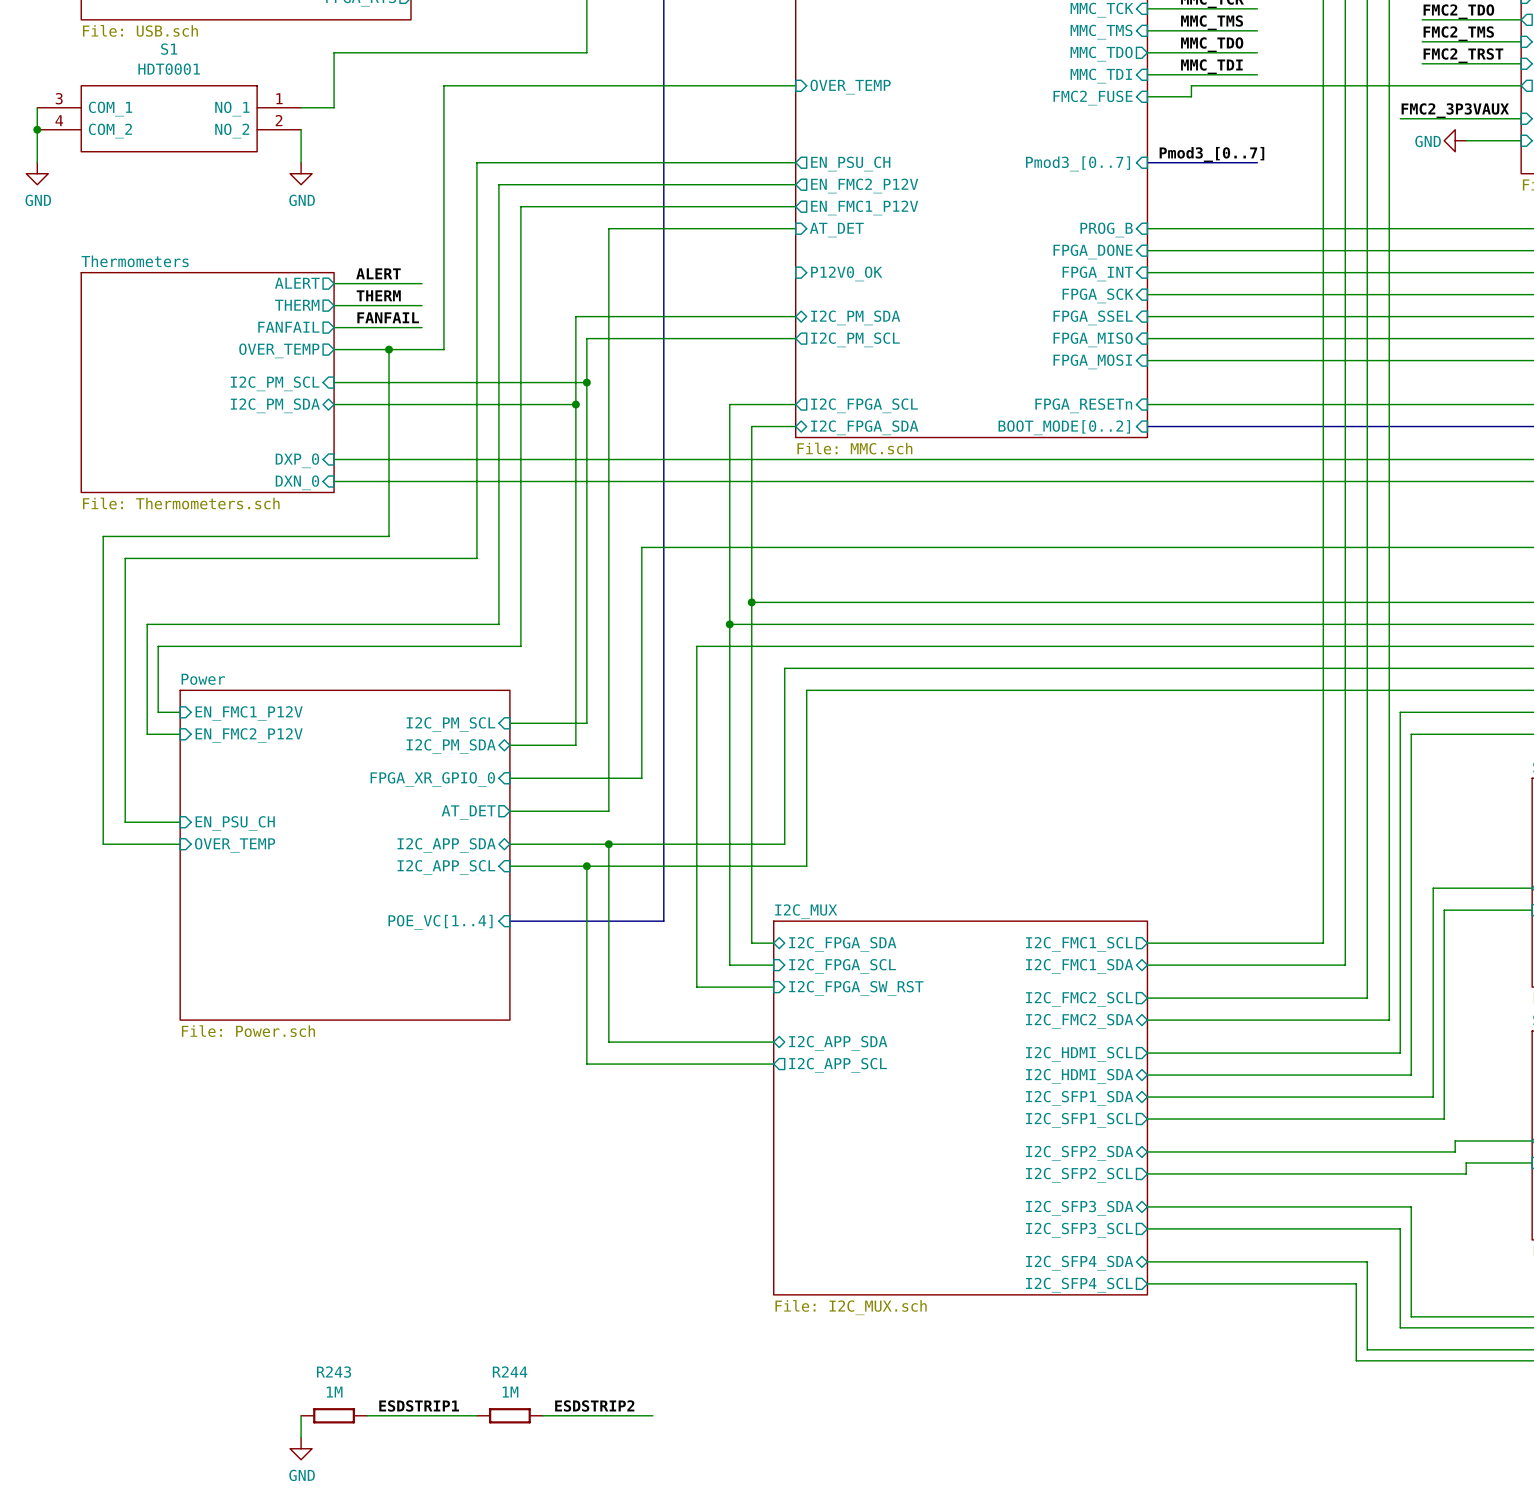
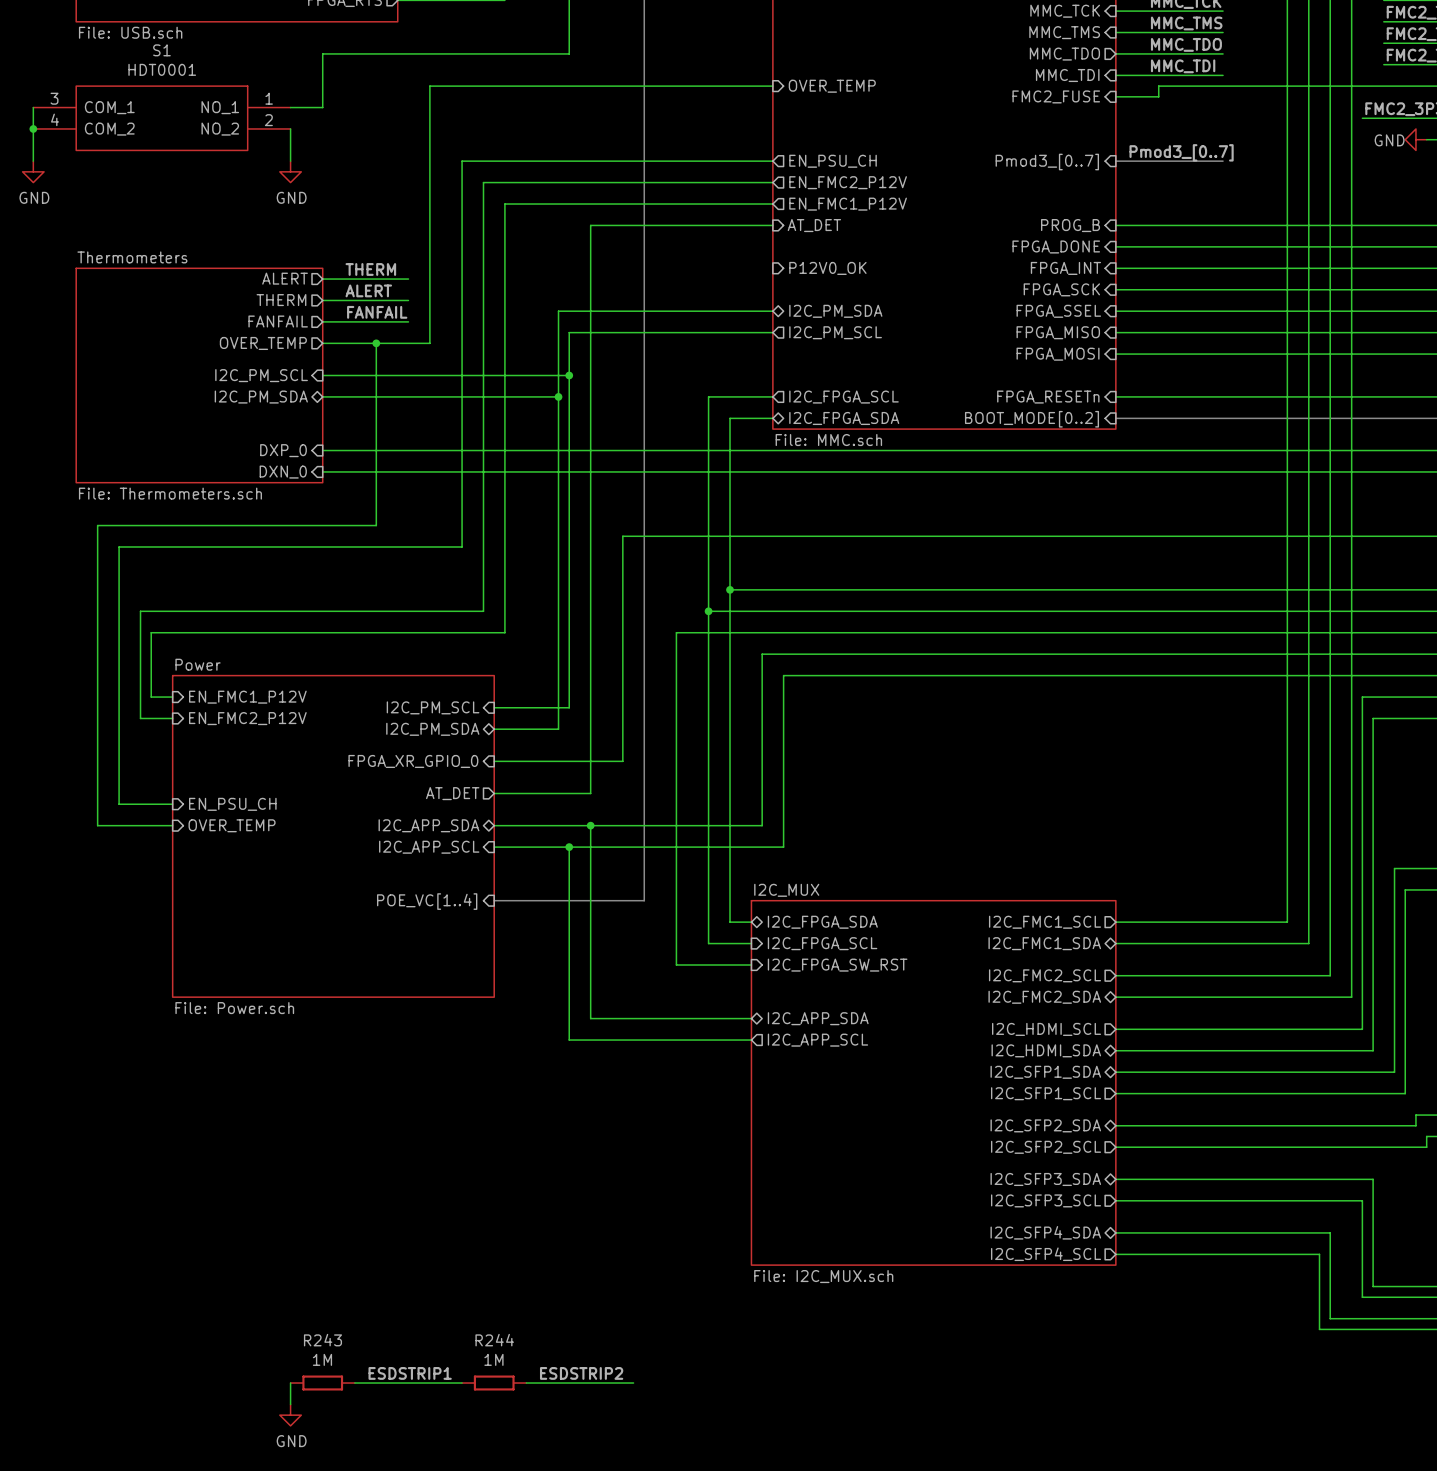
label: ALERT (378, 273) -> THERM (370, 269)
label: THERM (378, 295) -> ALERT (368, 290)

